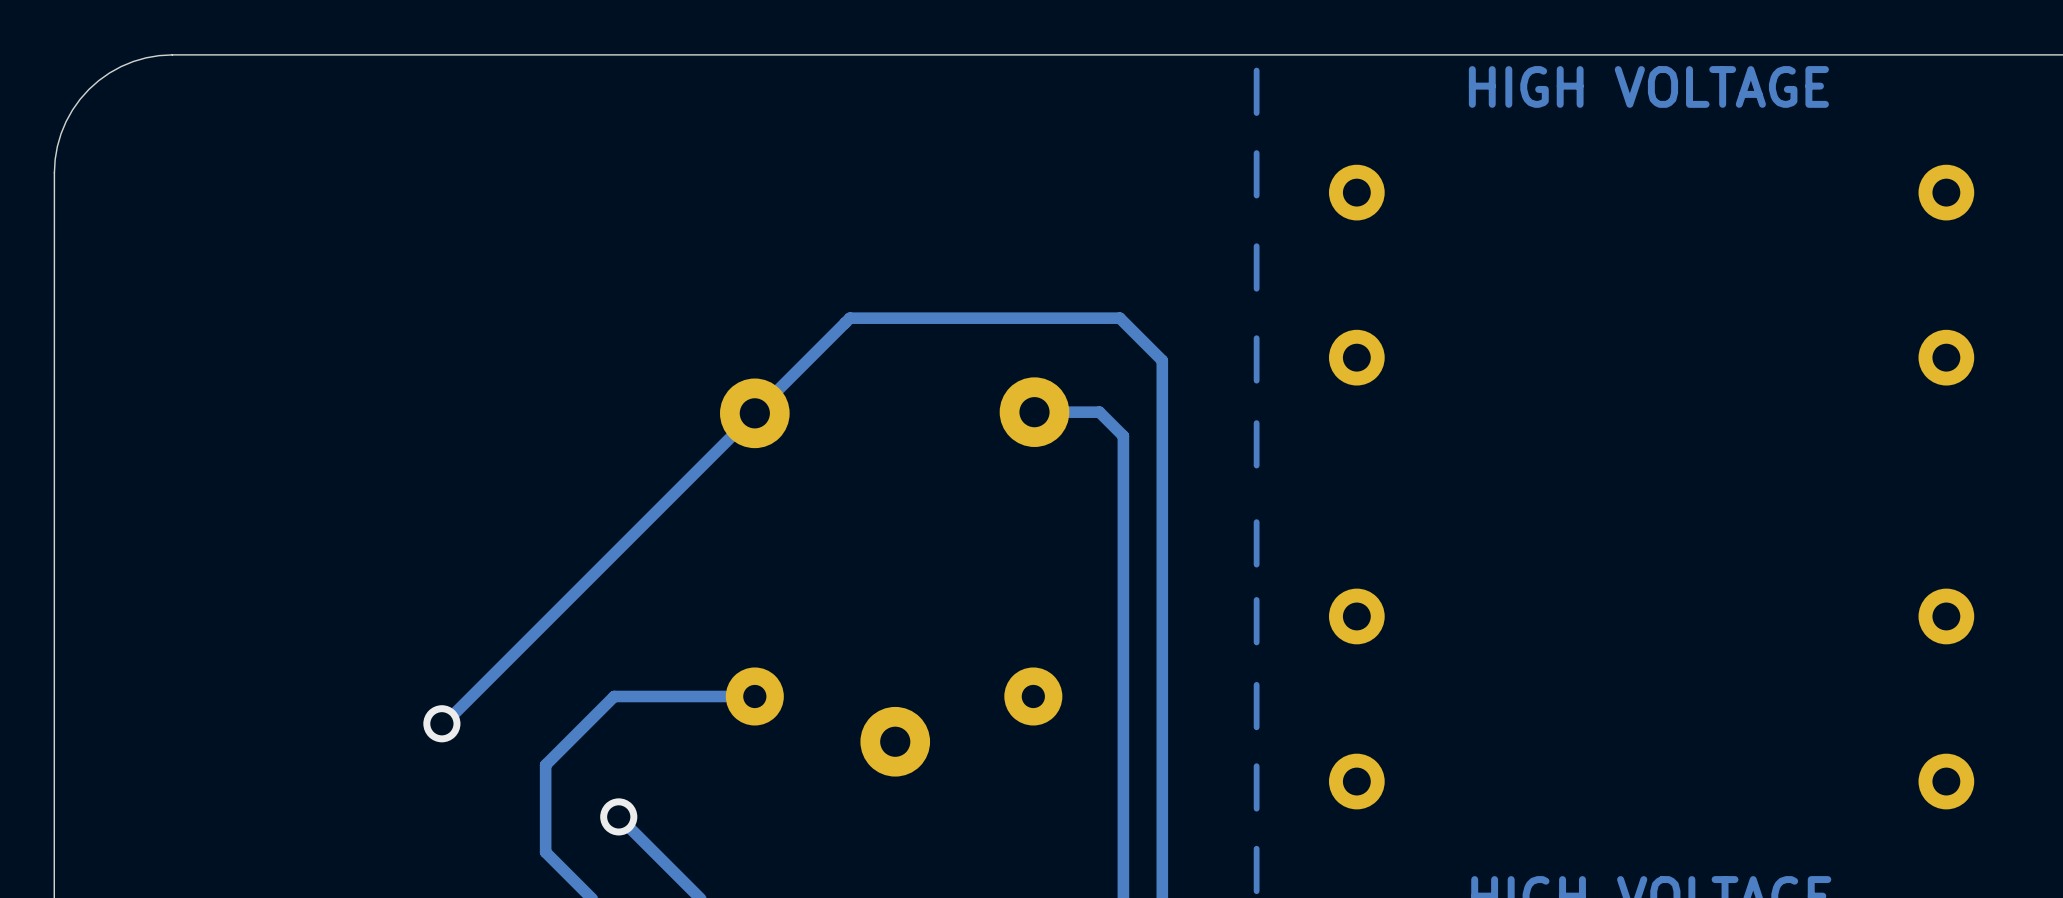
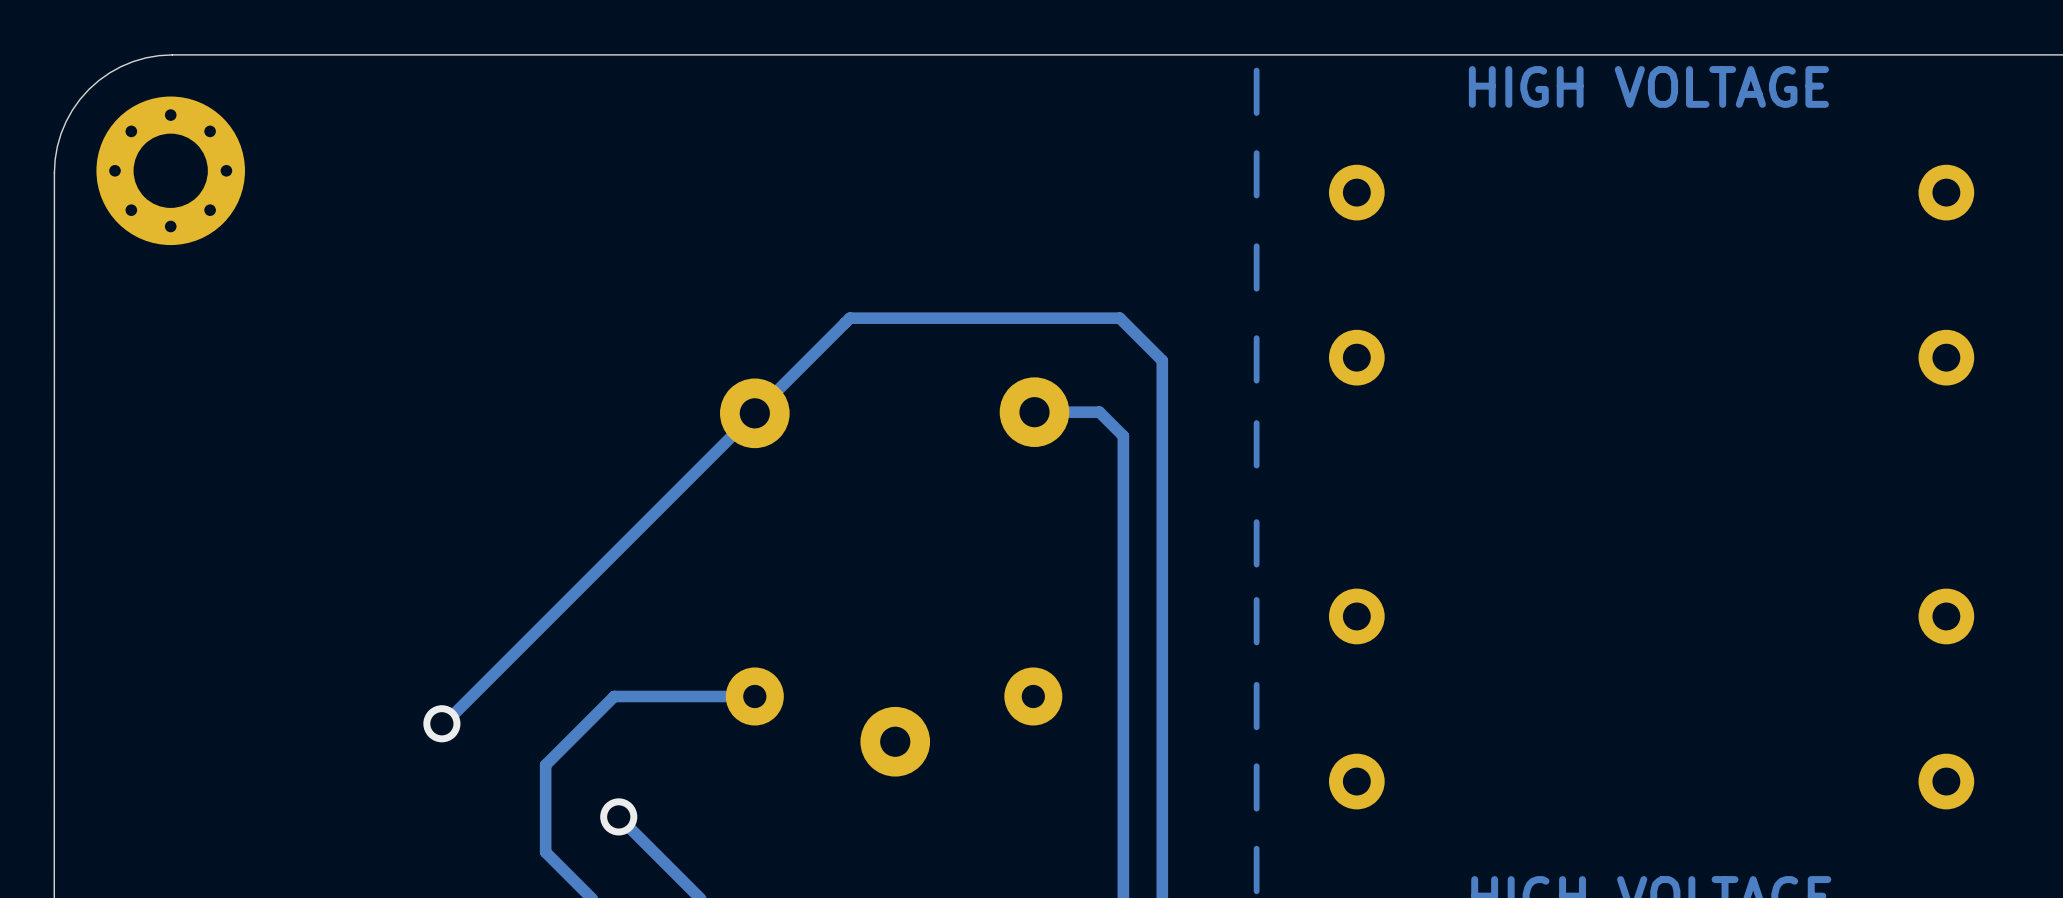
part: none -> (170, 170)

